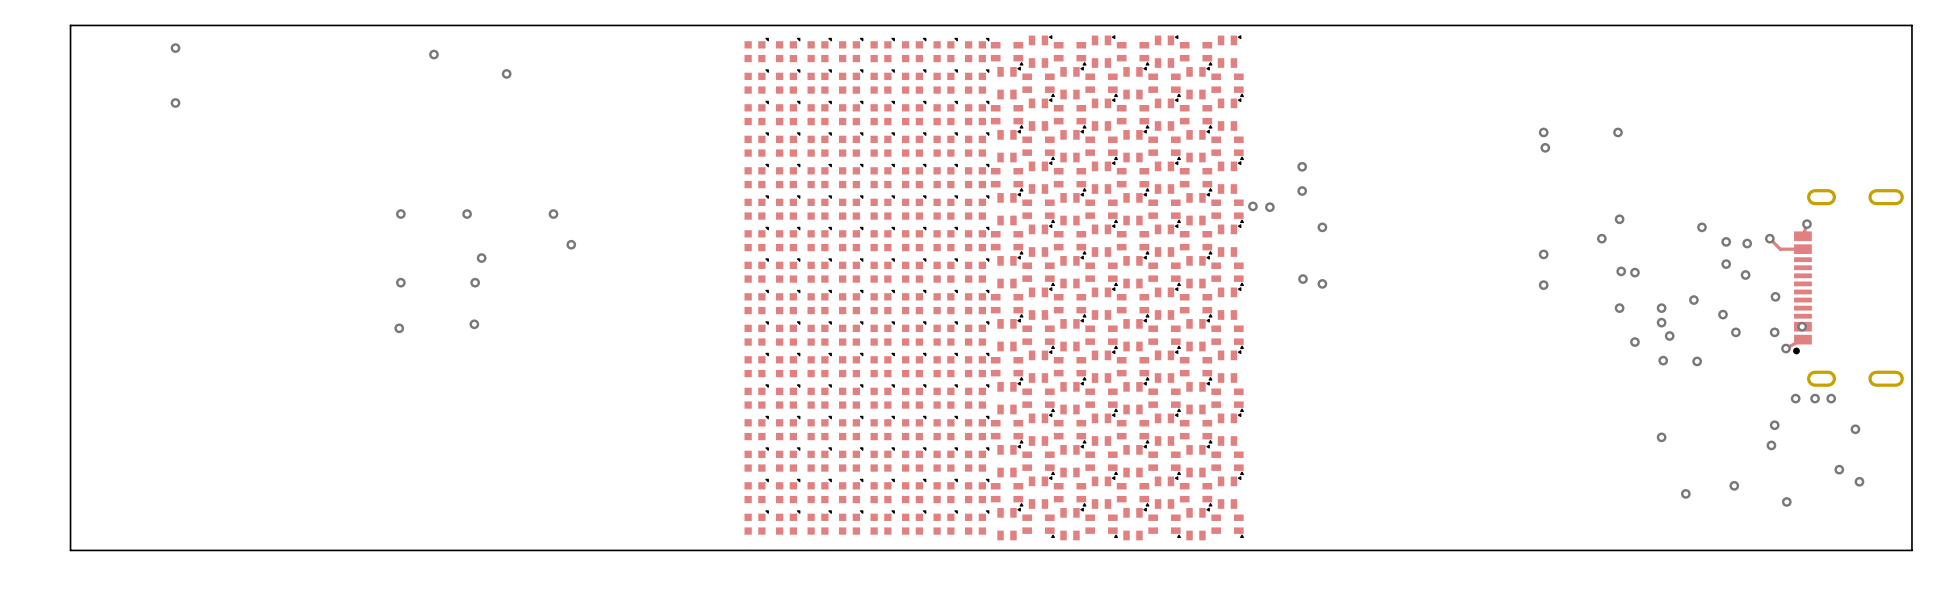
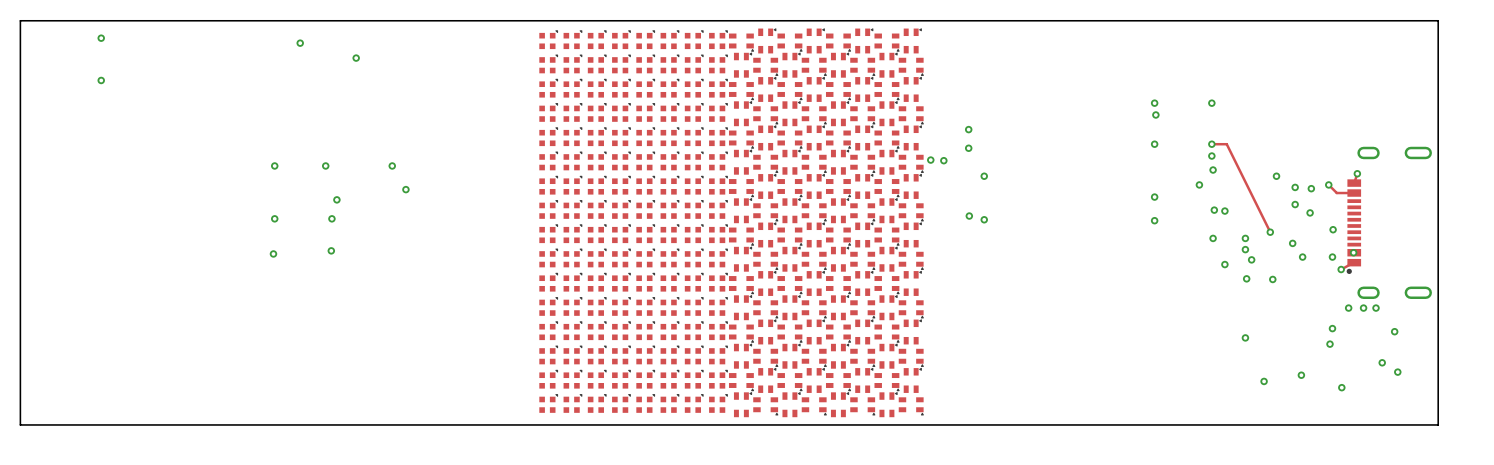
via: none -> (1154, 144)
track: none -> (1211, 144) (1226, 144) (1270, 232)
via: none -> (1211, 144)
via: none -> (1211, 156)

